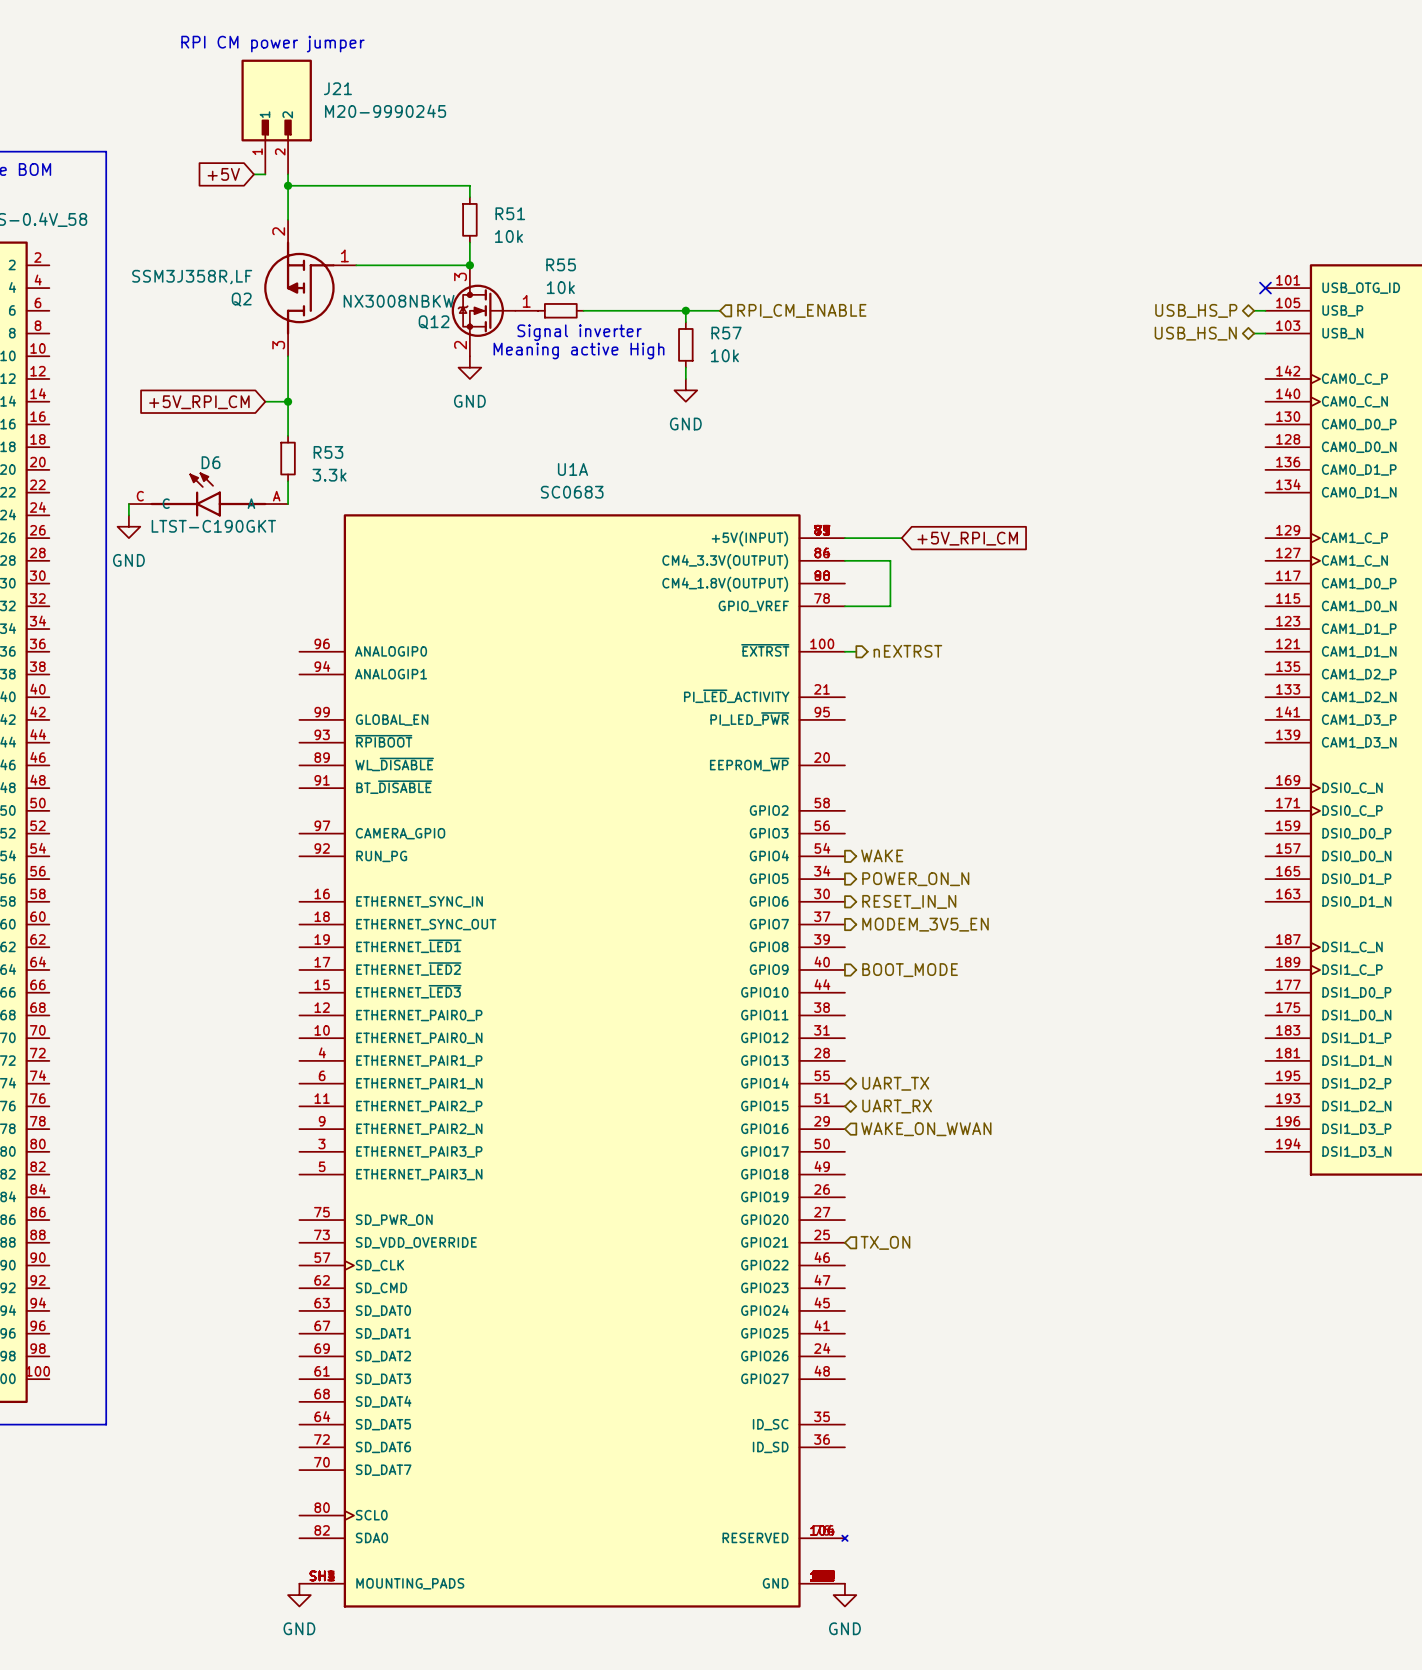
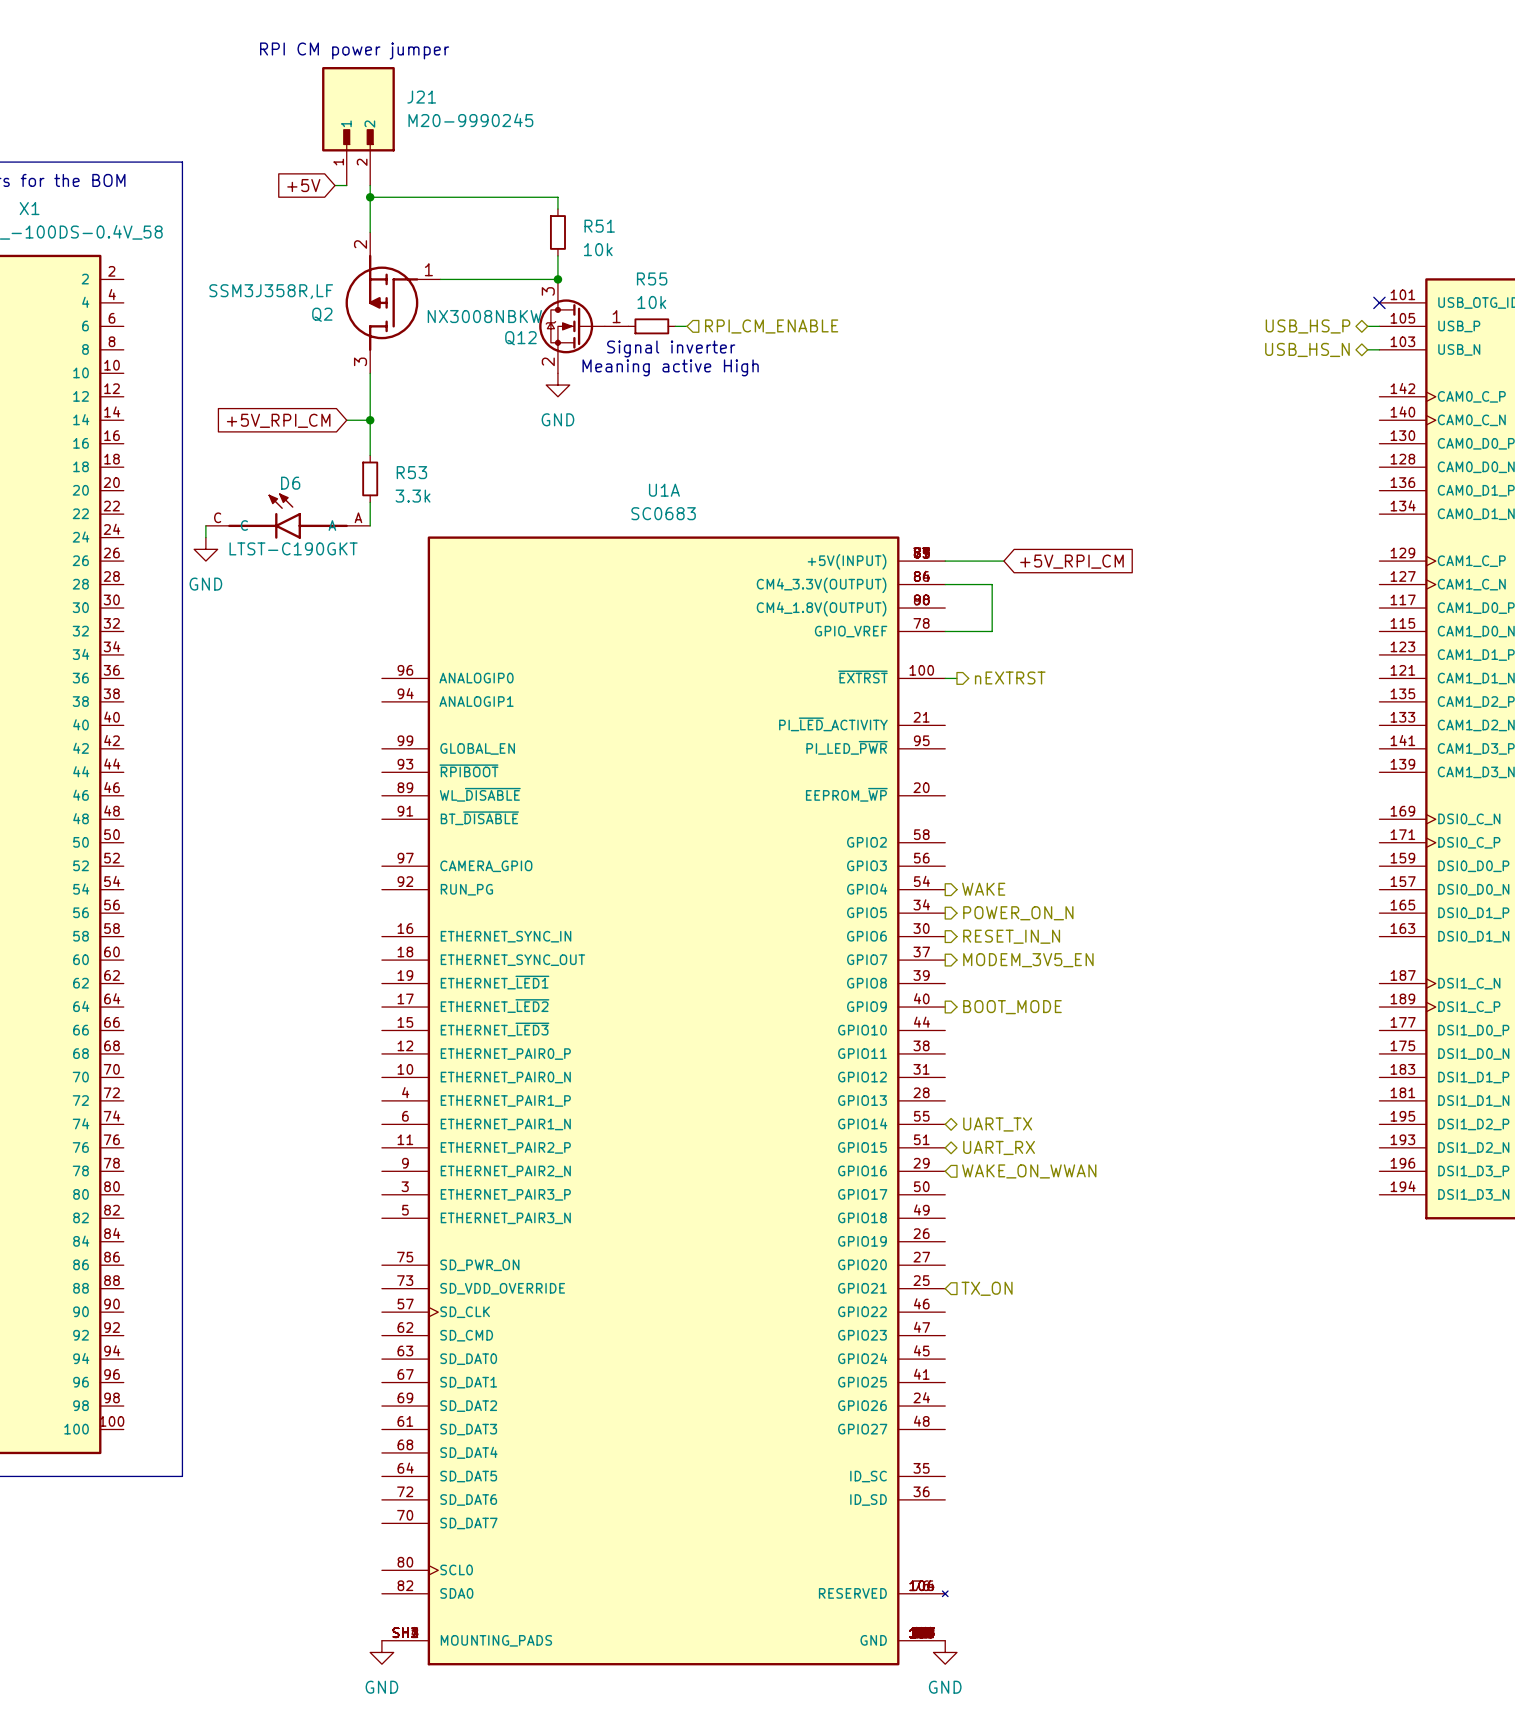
wire: (594, 310) (719, 310) -> none
wire: (685, 310) (685, 322) -> none
junction: (685, 310) -> none
hierarchical label position: RPI_CM_ENABLE (801, 310) -> RPI_CM_ENABLE (771, 326)
R57: 10k (685, 344) -> none
wire: (685, 367) (685, 378) -> none
power symbol: GND (685, 390) -> none

